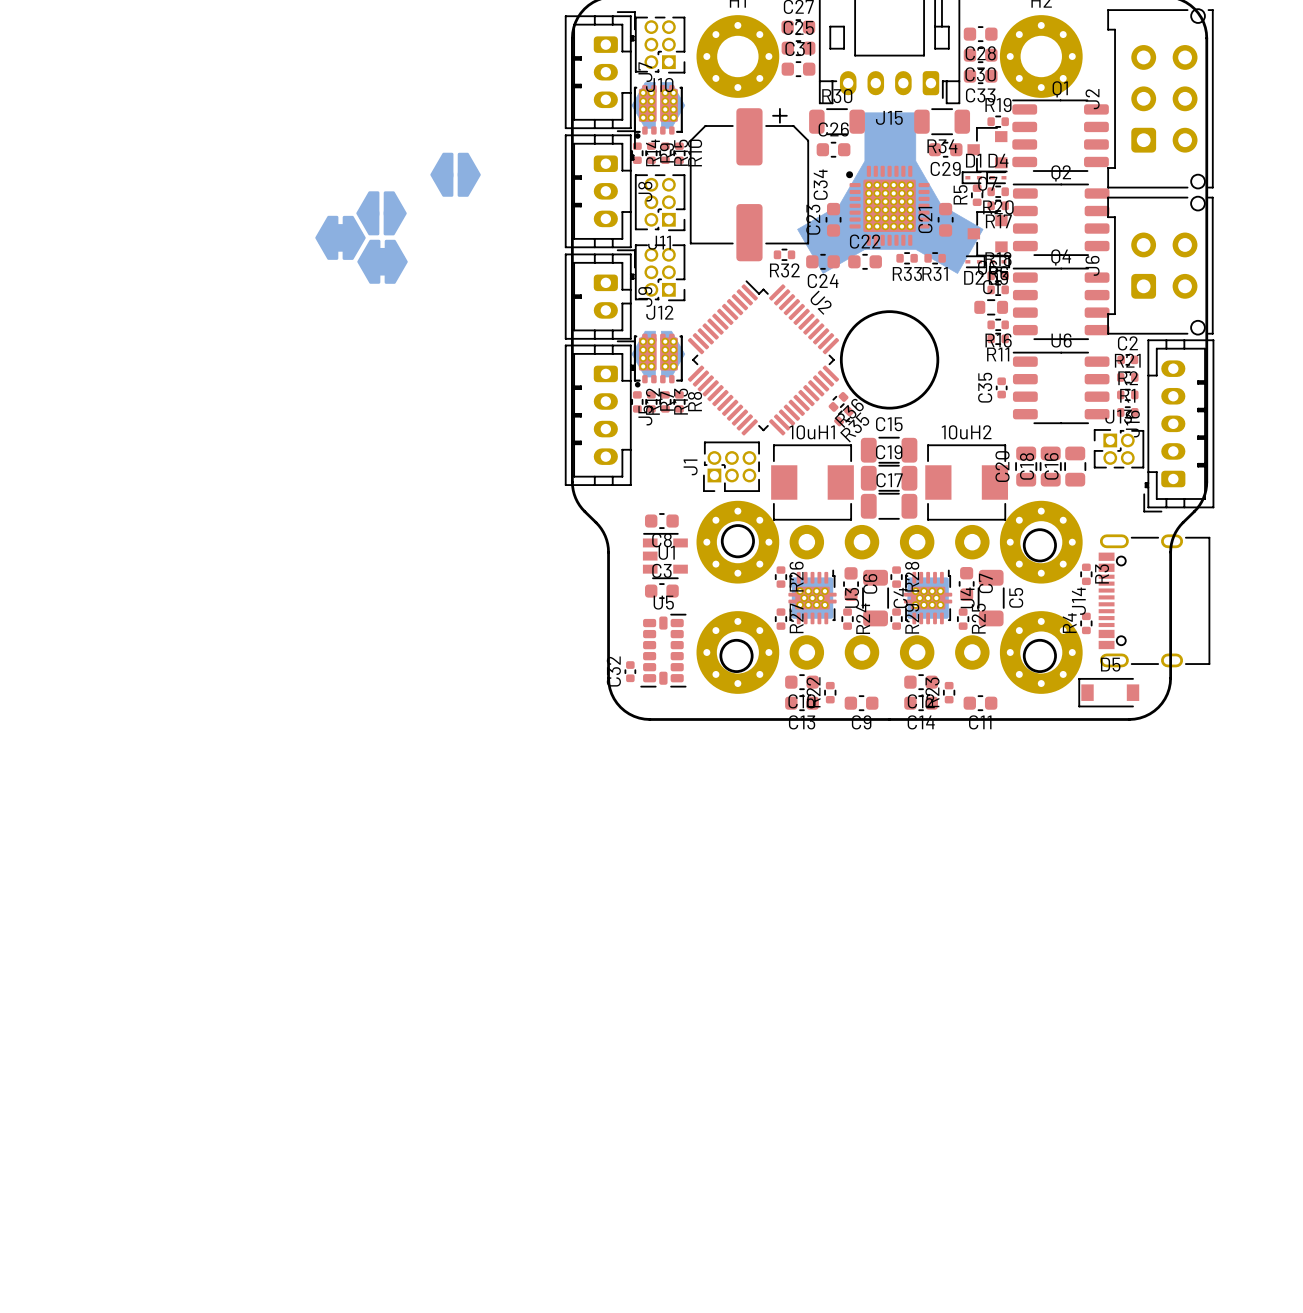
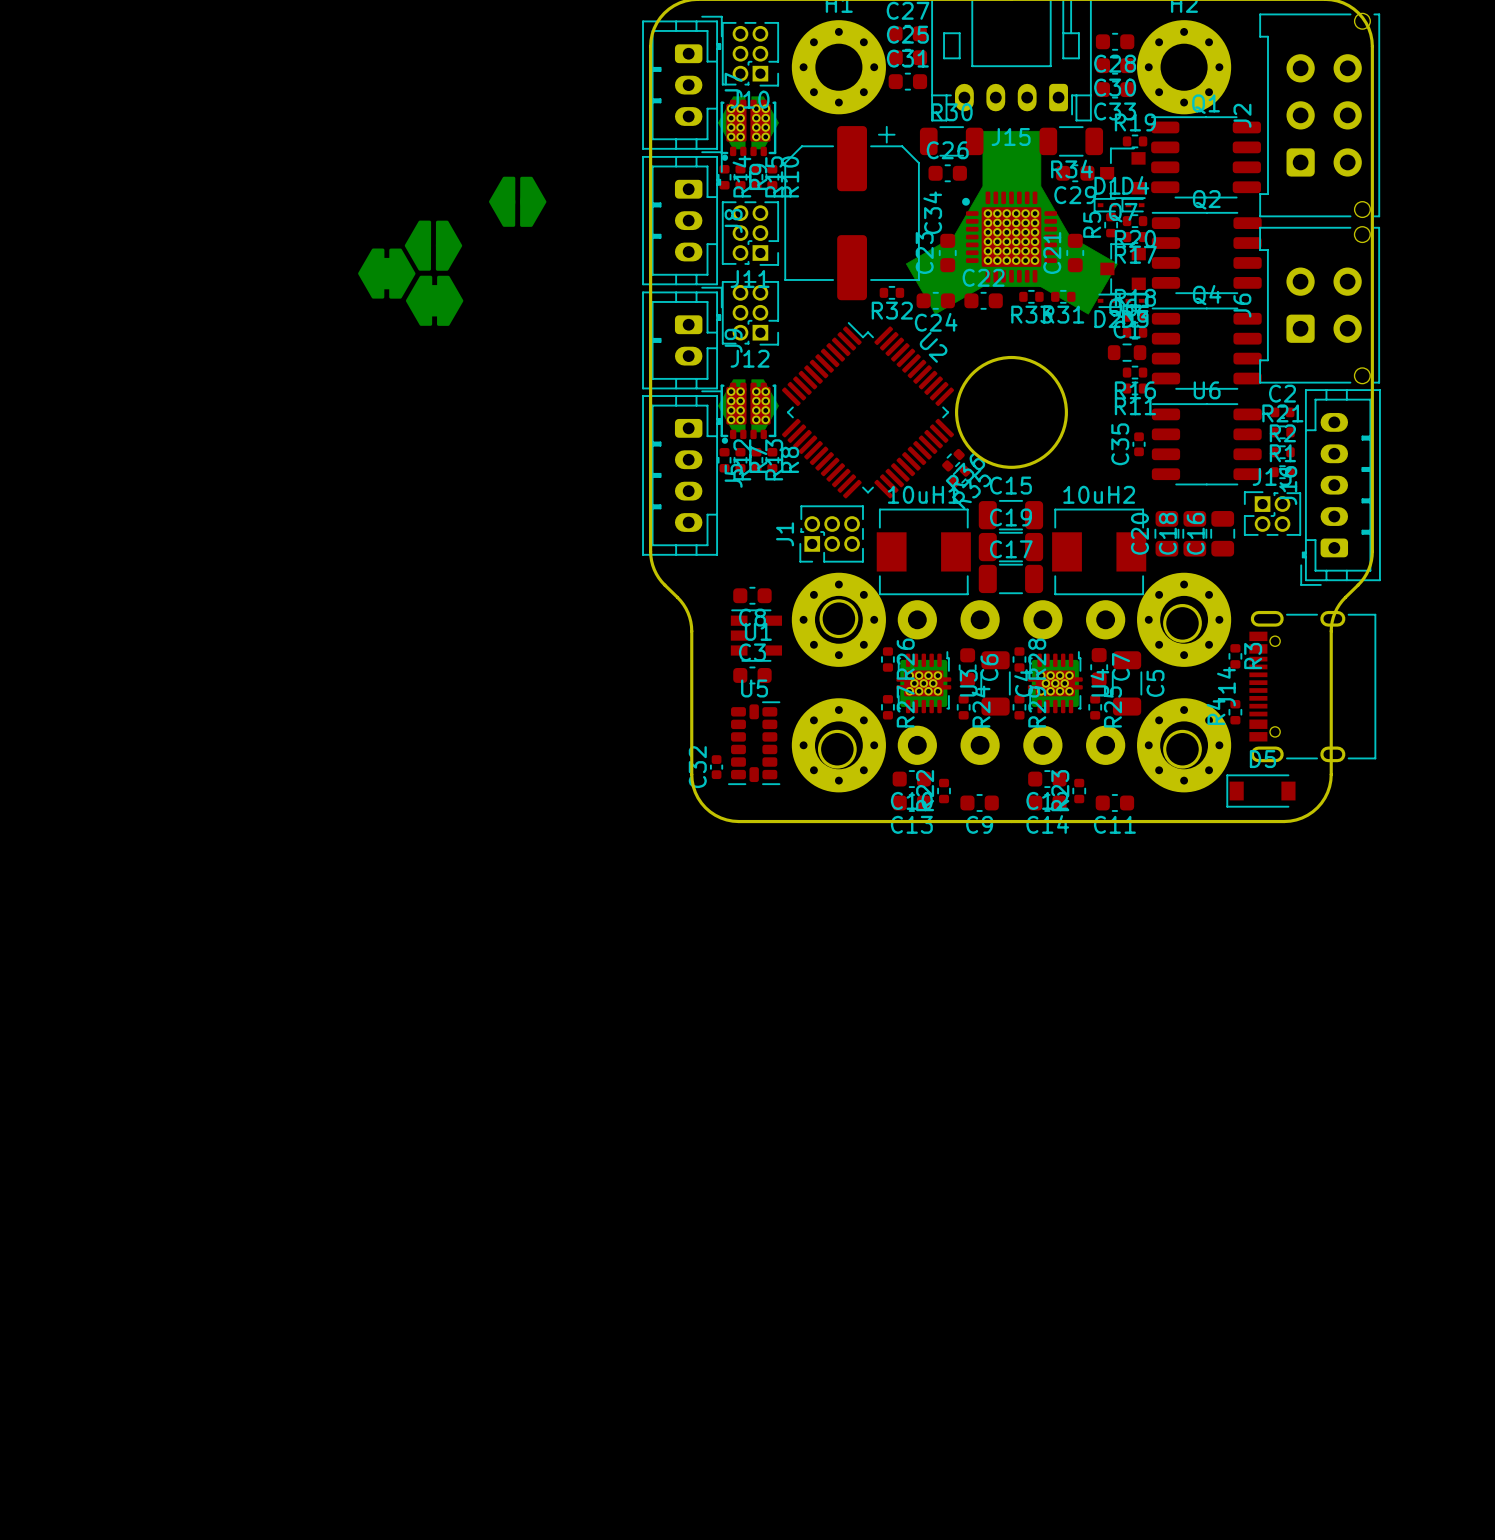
part footprint: [797, 112, 984, 274] -> [905, 130, 1118, 315]

